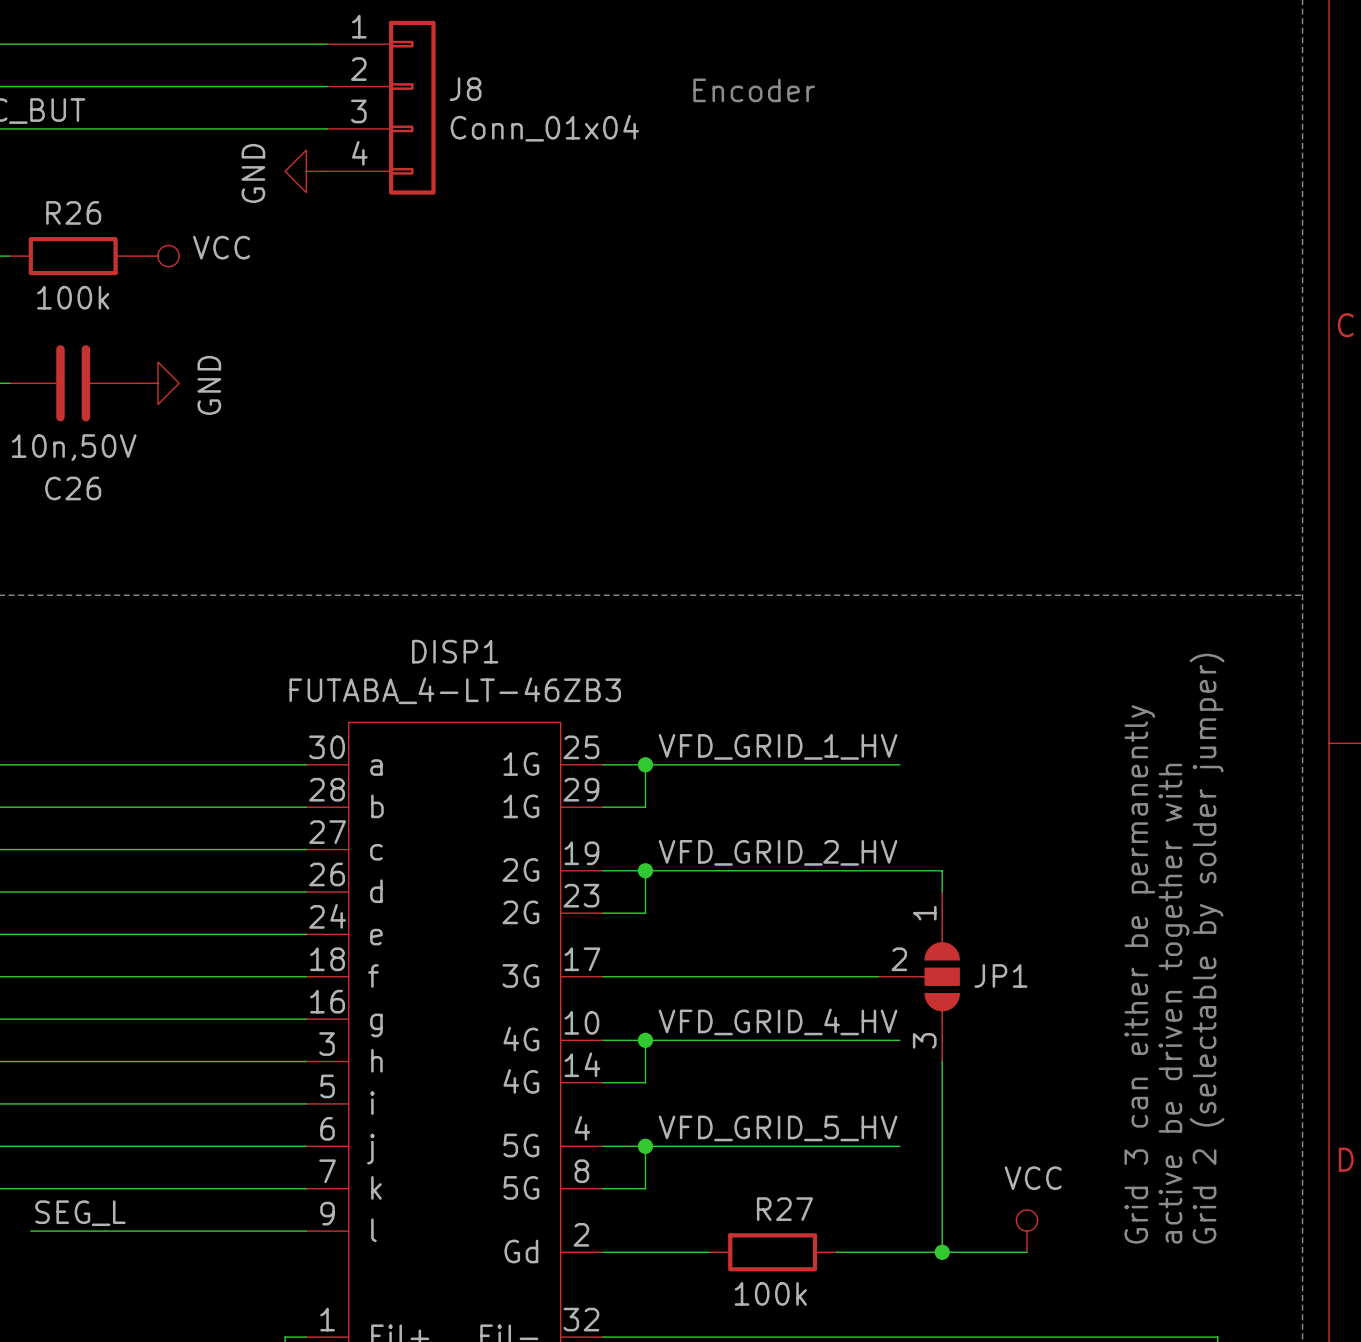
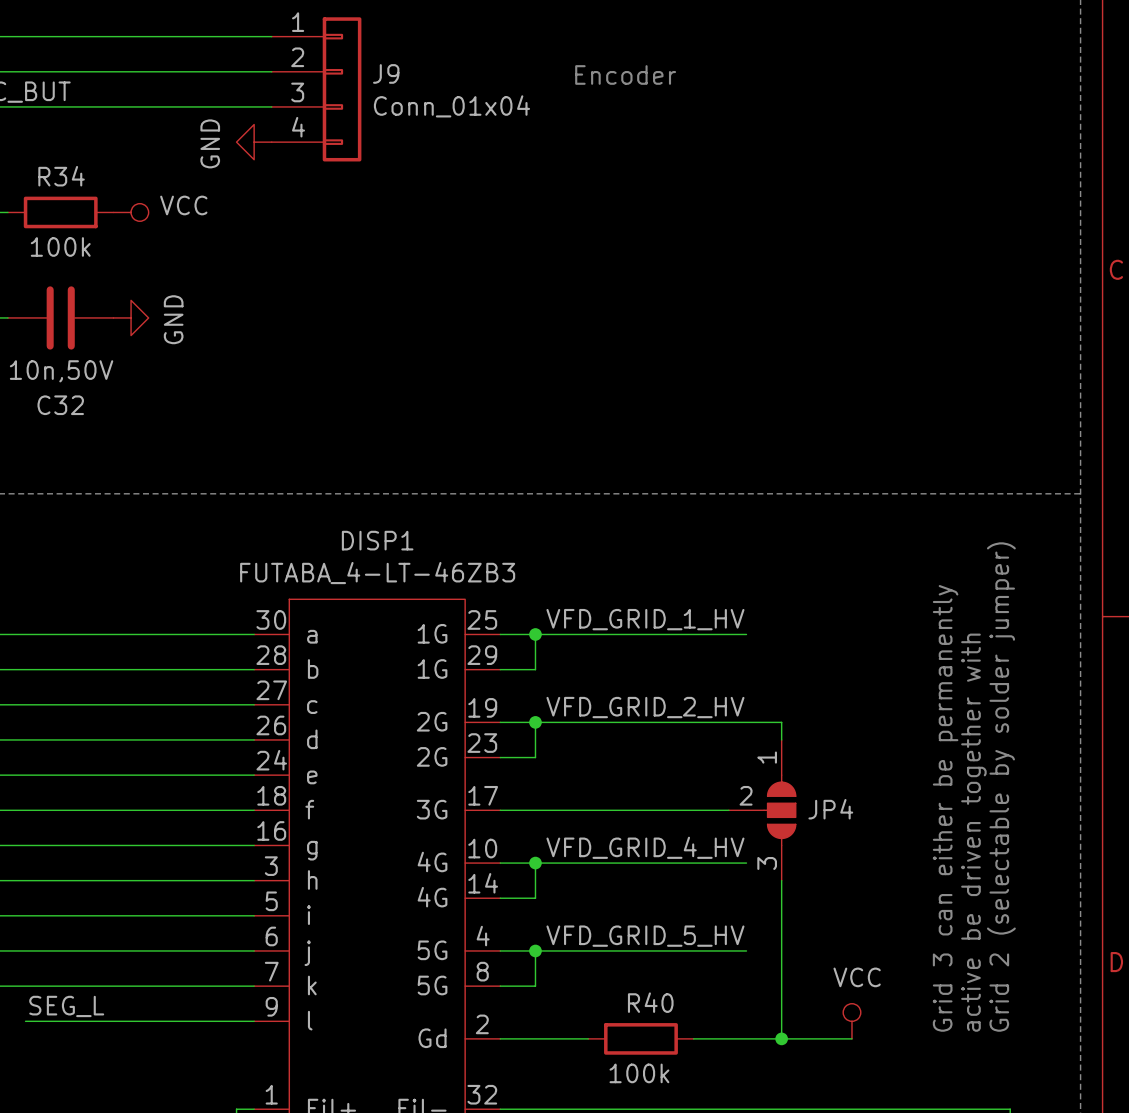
J8 name: J8 (465, 89) -> J9 (386, 73)
R26 name: R26 (73, 212) -> R34 (61, 176)
C26 name: C26 (73, 488) -> C32 (60, 405)
JP1 name: JP1 (1000, 975) -> JP4 (830, 809)
R27 name: R27 (784, 1209) -> R40 (650, 1002)

